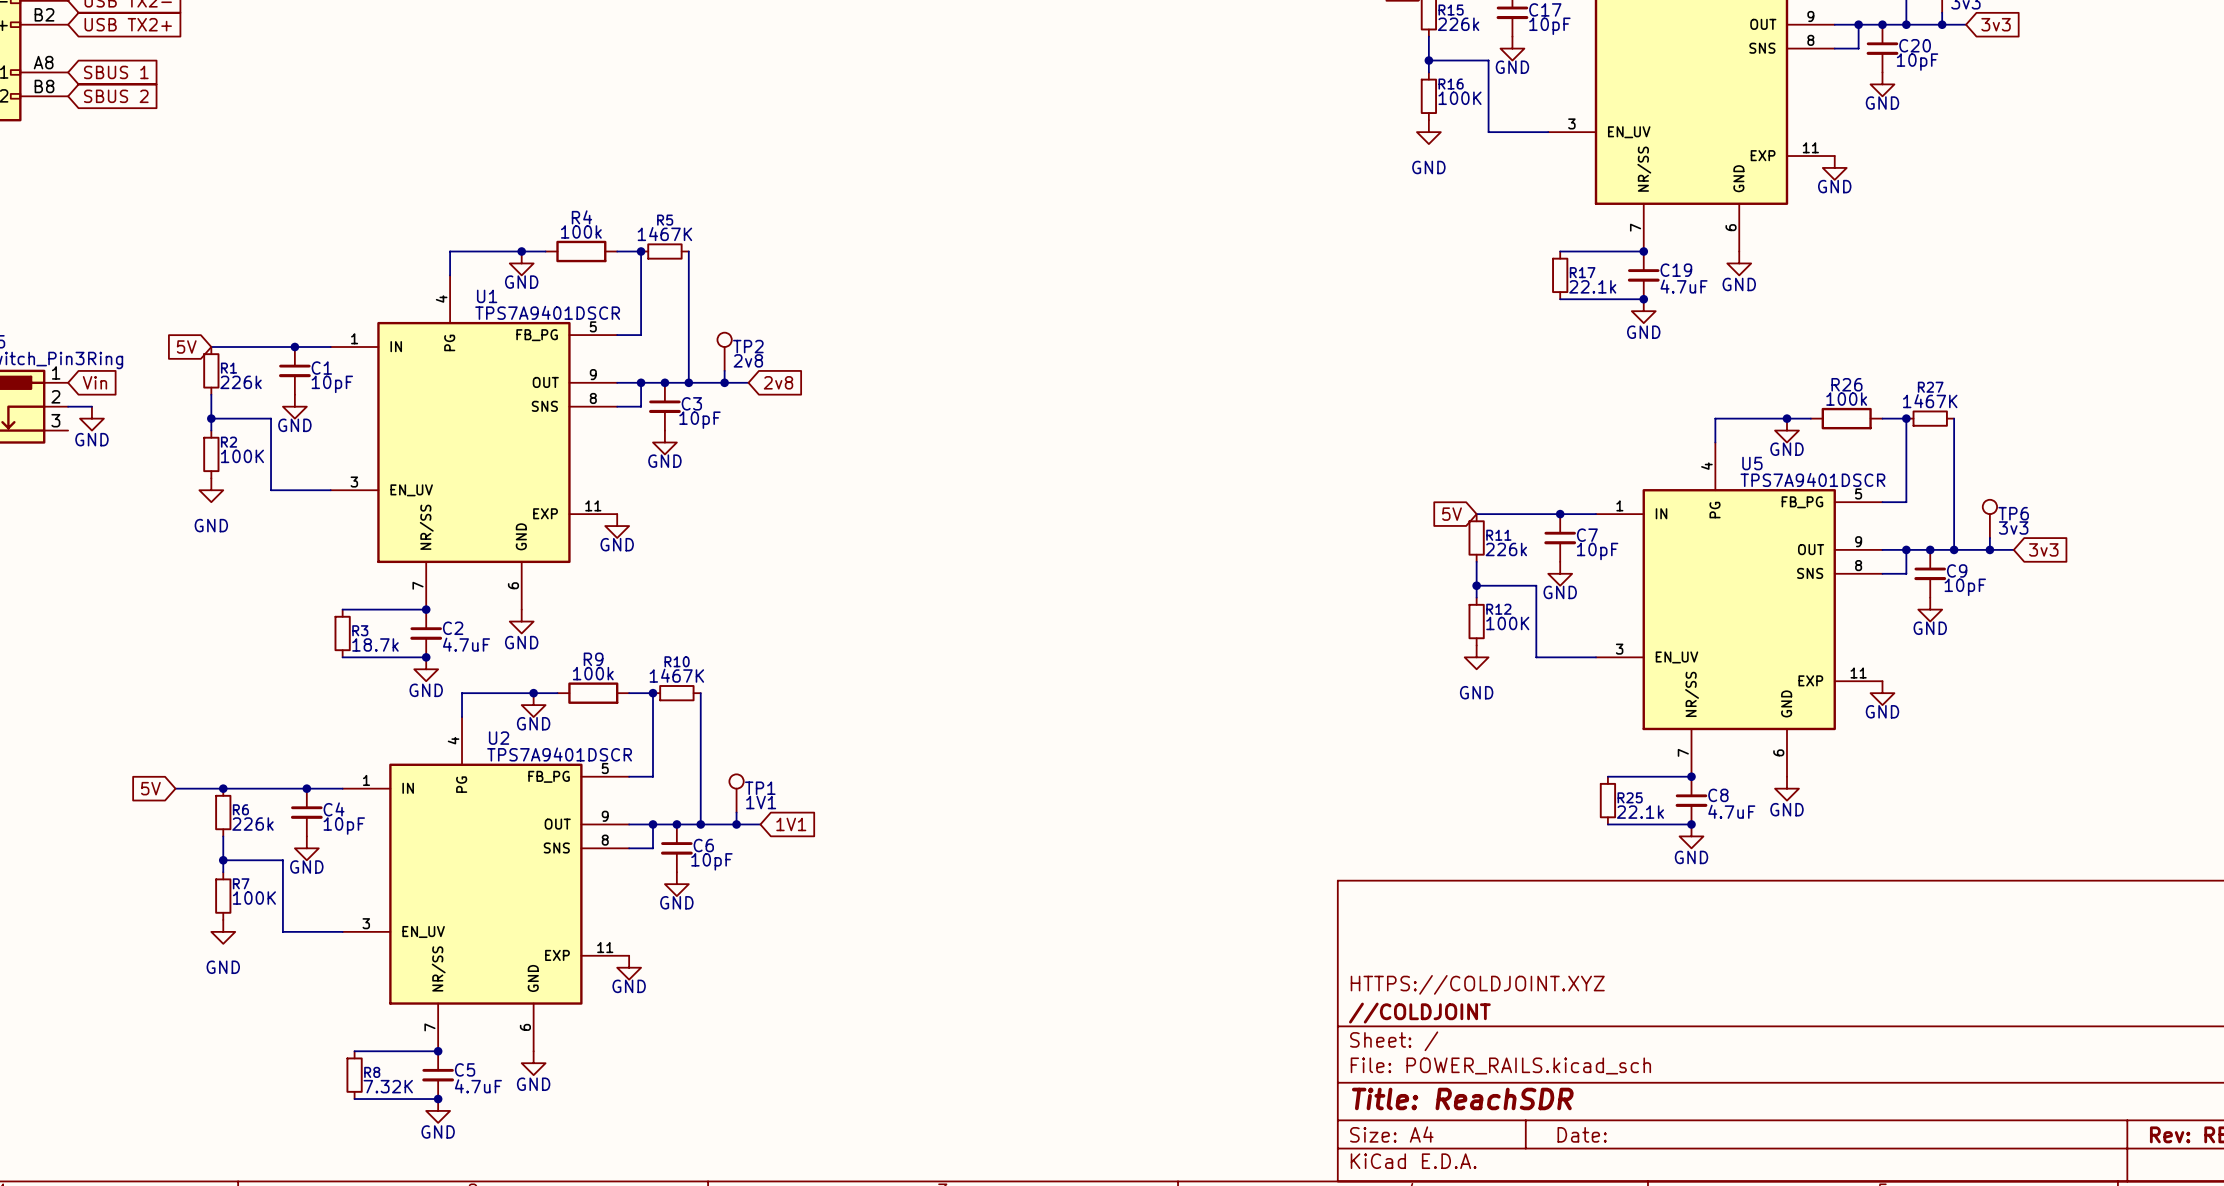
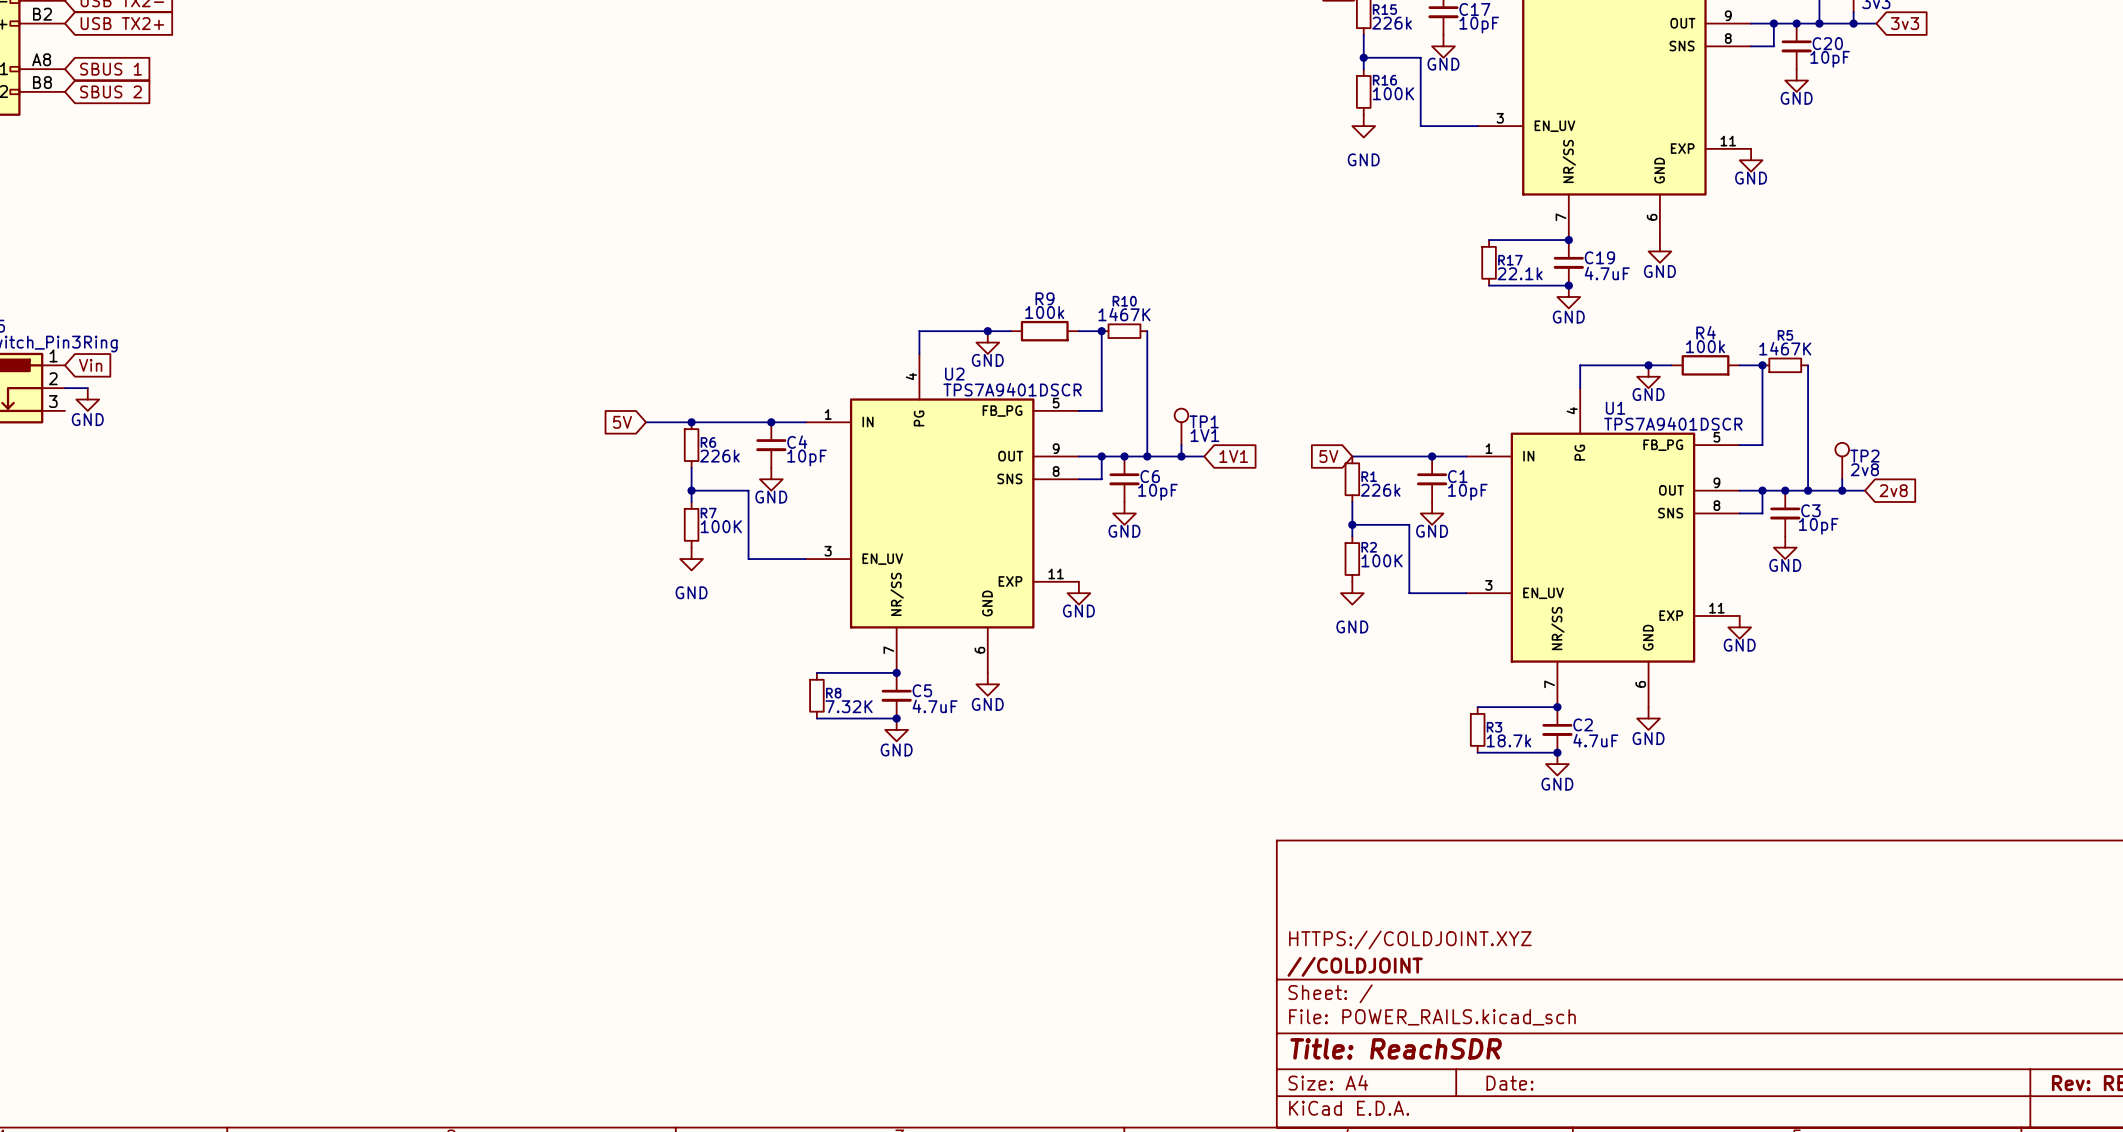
junction: (521, 251) -> none
wire: (545, 251) (450, 251) (450, 275) -> none
R4 position: (581, 251) -> (1705, 365)
wire: (617, 251) (641, 251) (641, 335) (617, 335) -> none
junction: (641, 251) -> none
R5 position: (664, 251) -> (1785, 365)
wire: (688, 251) (688, 382) -> none
power symbol: GND (521, 263) -> none
global label: 5V (186, 347) -> none
wire: (211, 347) (330, 347) -> none
junction: (294, 347) -> none
junction: none -> (987, 331)
wire: none -> (1010, 331) (919, 331) (919, 353)
wire: none -> (1078, 331) (1101, 331) (1101, 410) (1078, 410)
junction: none -> (1101, 331)
wire: none -> (1147, 331) (1147, 456)
TP2 position: (724, 351) -> (1842, 461)
power symbol: none -> GND (987, 342)
R1 position: (211, 370) -> (1352, 479)
C1 position: (294, 370) -> (1432, 479)
wire: (724, 370) (724, 382) -> none
wire: (617, 382) (748, 382) -> none
wire: (641, 382) (641, 406) (617, 406) -> none
junction: (641, 382) -> none
junction: (664, 382) -> none
junction: (688, 382) -> none
junction: (724, 382) -> none
global label: 2v8 (778, 382) -> none
junction: none -> (1648, 365)
junction: none -> (1762, 365)
wire: (211, 394) (211, 430) -> none
power symbol: GND (294, 406) -> none
C3 position: (664, 406) -> (1785, 513)
wire: (211, 418) (271, 418) (271, 490) (330, 490) -> none
junction: (211, 418) -> none
junction: (1786, 418) -> none
wire: (1810, 418) (1715, 418) (1715, 442) -> (1671, 365) (1580, 365) (1580, 388)
R26: 100k (1846, 418) -> none
wire: (1882, 418) (1906, 418) (1906, 502) (1882, 502) -> (1739, 365) (1762, 365) (1762, 445) (1739, 445)
junction: (1906, 418) -> none
R27: 1467K (1930, 418) -> none
wire: (1954, 418) (1954, 549) -> (1808, 365) (1808, 490)
power symbol position: GND (1786, 430) -> GND (1648, 376)
U1 position: (473, 442) -> (1602, 547)
global label: none -> 5V (622, 422)
power symbol: GND (664, 442) -> none
wire: none -> (646, 422) (805, 422)
junction: none -> (691, 422)
junction: none -> (771, 422)
R2 position: (211, 454) -> (1352, 559)
wire: none -> (1181, 445) (1181, 456)
wire: none -> (1078, 456) (1204, 456)
wire: none -> (1101, 456) (1101, 479) (1078, 479)
junction: none -> (1101, 456)
junction: none -> (1124, 456)
junction: none -> (1147, 456)
junction: none -> (1181, 456)
global label: none -> 1V1 (1233, 456)
junction: none -> (1432, 456)
power symbol: GND (211, 490) -> none
wire: none -> (691, 467) (691, 502)
power symbol: none -> GND (771, 479)
wire: none -> (691, 490) (748, 490) (748, 559) (805, 559)
junction: none -> (691, 490)
global label position: 5V (1452, 514) -> 5V (1328, 456)
wire: (1476, 514) (1596, 514) -> (1352, 456) (1466, 456)
junction: (1560, 514) -> none
junction: none -> (1762, 490)
junction: none -> (1785, 490)
junction: none -> (1808, 490)
junction: none -> (1842, 490)
global label: none -> 2v8 (1893, 490)
TP6: 3v3 (1989, 518) -> none
power symbol: GND (617, 526) -> none
wire: none -> (1352, 502) (1352, 536)
power symbol: none -> GND (1124, 513)
R11: 226k (1476, 537) -> none
power symbol: none -> GND (1432, 513)
C7: 10pF (1560, 537) -> none
wire: (1989, 537) (1989, 549) -> (1842, 479) (1842, 490)
wire: none -> (1352, 524) (1409, 524) (1409, 536)
junction: none -> (1352, 524)
wire: (1882, 549) (2013, 549) -> (1739, 490) (1865, 490)
wire: (1906, 549) (1906, 573) (1882, 573) -> (1762, 490) (1762, 513) (1739, 513)
junction: (1906, 549) -> none
junction: (1930, 549) -> none
junction: (1954, 549) -> none
junction: (1989, 549) -> none
global label: 3v3 (2043, 549) -> none
power symbol: GND (1560, 573) -> none
power symbol: none -> GND (1785, 547)
C9: 10pF (1930, 573) -> none
power symbol: none -> GND (691, 559)
wire: (1476, 585) (1536, 585) (1536, 657) (1596, 657) -> none
junction: (1476, 585) -> none
wire: none -> (1409, 570) (1409, 593) (1466, 593)
wire: (342, 609) (426, 609) -> none
junction: (426, 609) -> none
U5: TPS7A9401DSCR (1739, 609) -> none
power symbol: GND (1930, 609) -> none
power symbol: GND (521, 621) -> none
power symbol: none -> GND (1078, 593)
power symbol: none -> GND (1352, 593)
R12: 100K (1476, 621) -> none
R3 position: (342, 633) -> (1477, 729)
C2 position: (426, 633) -> (1557, 729)
wire: (342, 657) (426, 657) -> none
junction: (426, 657) -> none
power symbol: GND (1476, 657) -> none
power symbol: none -> GND (1739, 627)
power symbol: GND (426, 669) -> none
junction: (533, 693) -> none
wire: (557, 693) (462, 693) (462, 717) -> none
R9 position: (593, 693) -> (1044, 331)
wire: (629, 693) (653, 693) (653, 776) (629, 776) -> none
junction: (653, 693) -> none
R10 position: (676, 693) -> (1124, 331)
wire: (700, 693) (700, 824) -> none
power symbol: GND (1882, 693) -> none
power symbol: GND (533, 705) -> none
wire: none -> (816, 672) (896, 672)
junction: none -> (896, 672)
power symbol: none -> GND (987, 684)
junction: none -> (1557, 707)
wire: none -> (816, 718) (896, 718)
junction: none -> (896, 718)
power symbol: none -> GND (1648, 718)
power symbol: none -> GND (896, 729)
wire: (1607, 776) (1691, 776) -> (1477, 707) (1557, 707)
junction: (1691, 776) -> none
global label: 5V (150, 788) -> none
wire: (175, 788) (342, 788) -> none
junction: (223, 788) -> none
junction: (306, 788) -> none
junction: none -> (1557, 752)
power symbol: GND (1786, 788) -> none
TP1 position: (736, 793) -> (1181, 426)
R25: 22.1k (1607, 800) -> none
power symbol: none -> GND (1557, 764)
C8: 4.7uF (1691, 800) -> none
R6 position: (223, 812) -> (691, 445)
C4 position: (306, 812) -> (771, 445)
wire: (736, 812) (736, 824) -> none
wire: (629, 824) (760, 824) -> none
wire: (653, 824) (653, 848) (629, 848) -> none
junction: (653, 824) -> none
junction: (676, 824) -> none
junction: (700, 824) -> none
junction: (736, 824) -> none
global label: 1V1 (791, 824) -> none
wire: (1607, 824) (1691, 824) -> (1477, 752) (1557, 752)
junction: (1691, 824) -> none
wire: (223, 836) (223, 872) -> none
power symbol: GND (1691, 836) -> none
power symbol: GND (306, 848) -> none
C6 position: (676, 848) -> (1124, 479)
wire: (223, 860) (282, 860) (282, 931) (342, 931) -> none
junction: (223, 860) -> none
U2 position: (485, 884) -> (942, 513)
power symbol: GND (676, 884) -> none
R7 position: (223, 896) -> (691, 524)
power symbol: GND (223, 931) -> none
power symbol: GND (629, 967) -> none
wire: (354, 1051) (438, 1051) -> none
junction: (438, 1051) -> none
power symbol: GND (533, 1063) -> none
R8 position: (354, 1075) -> (816, 695)
C5 position: (438, 1075) -> (896, 695)
wire: (354, 1099) (438, 1099) -> none
junction: (438, 1099) -> none
power symbol: GND (438, 1110) -> none

